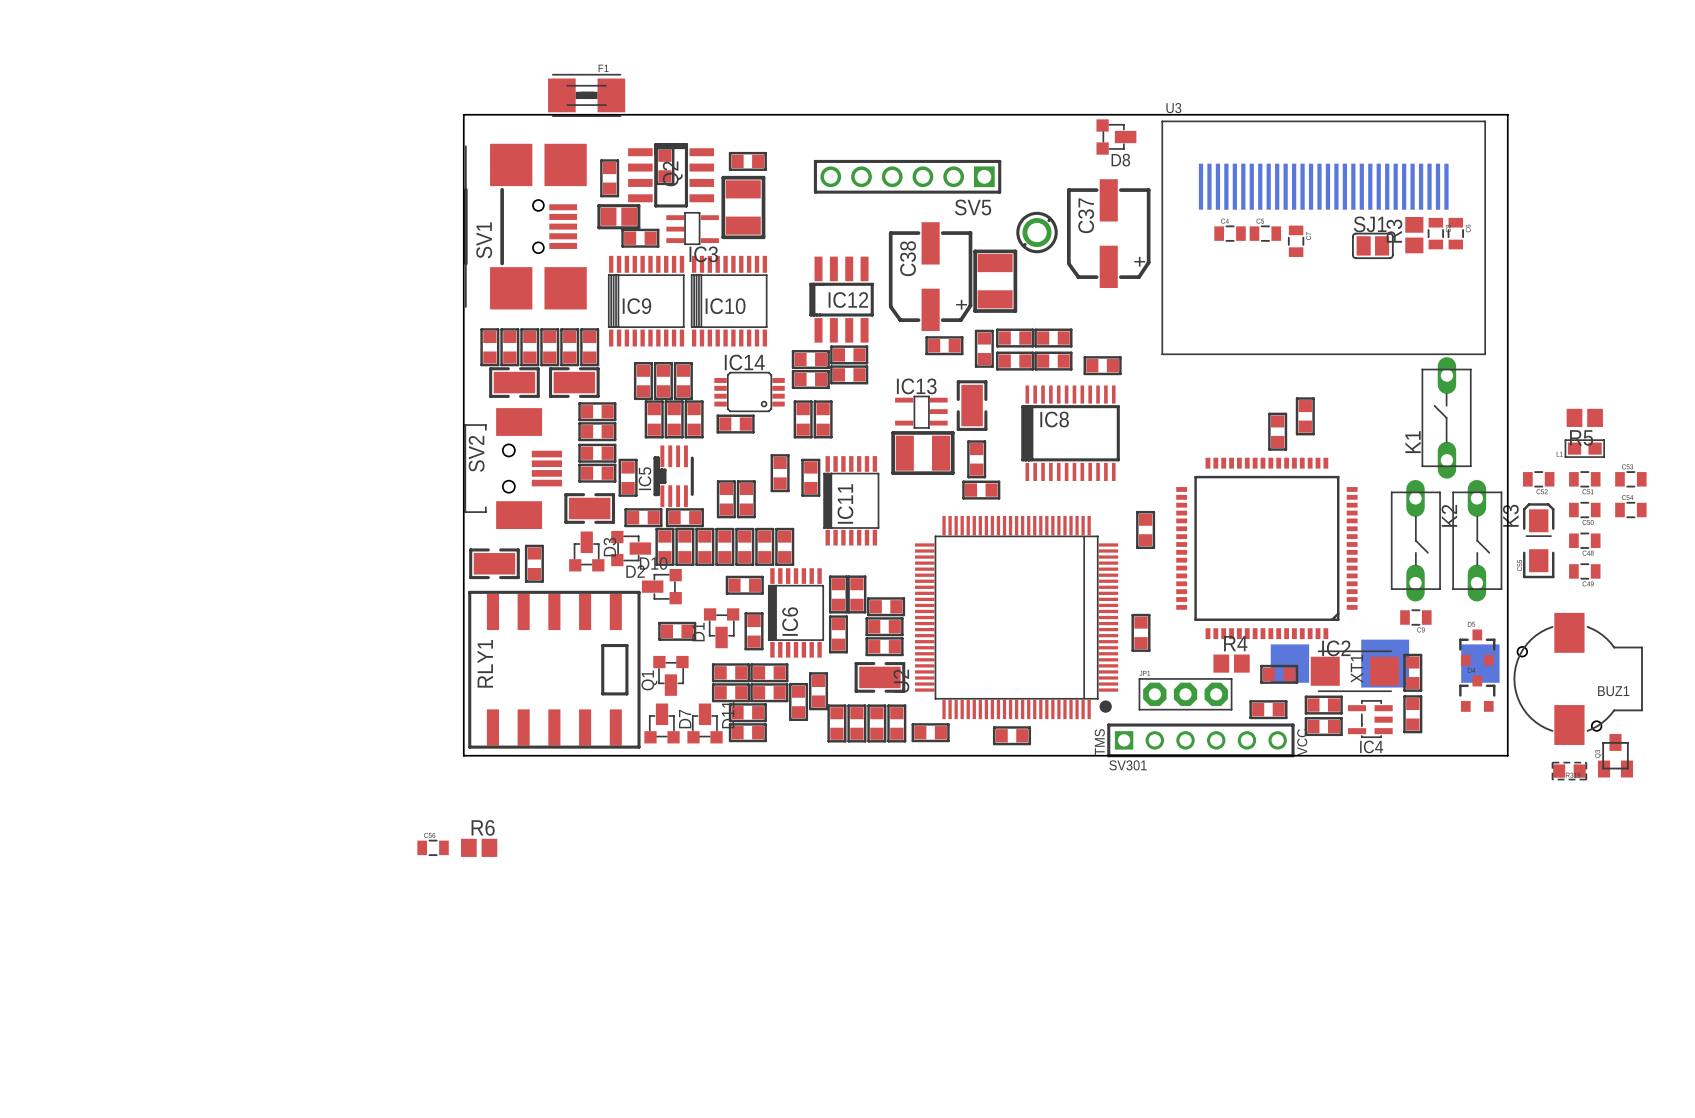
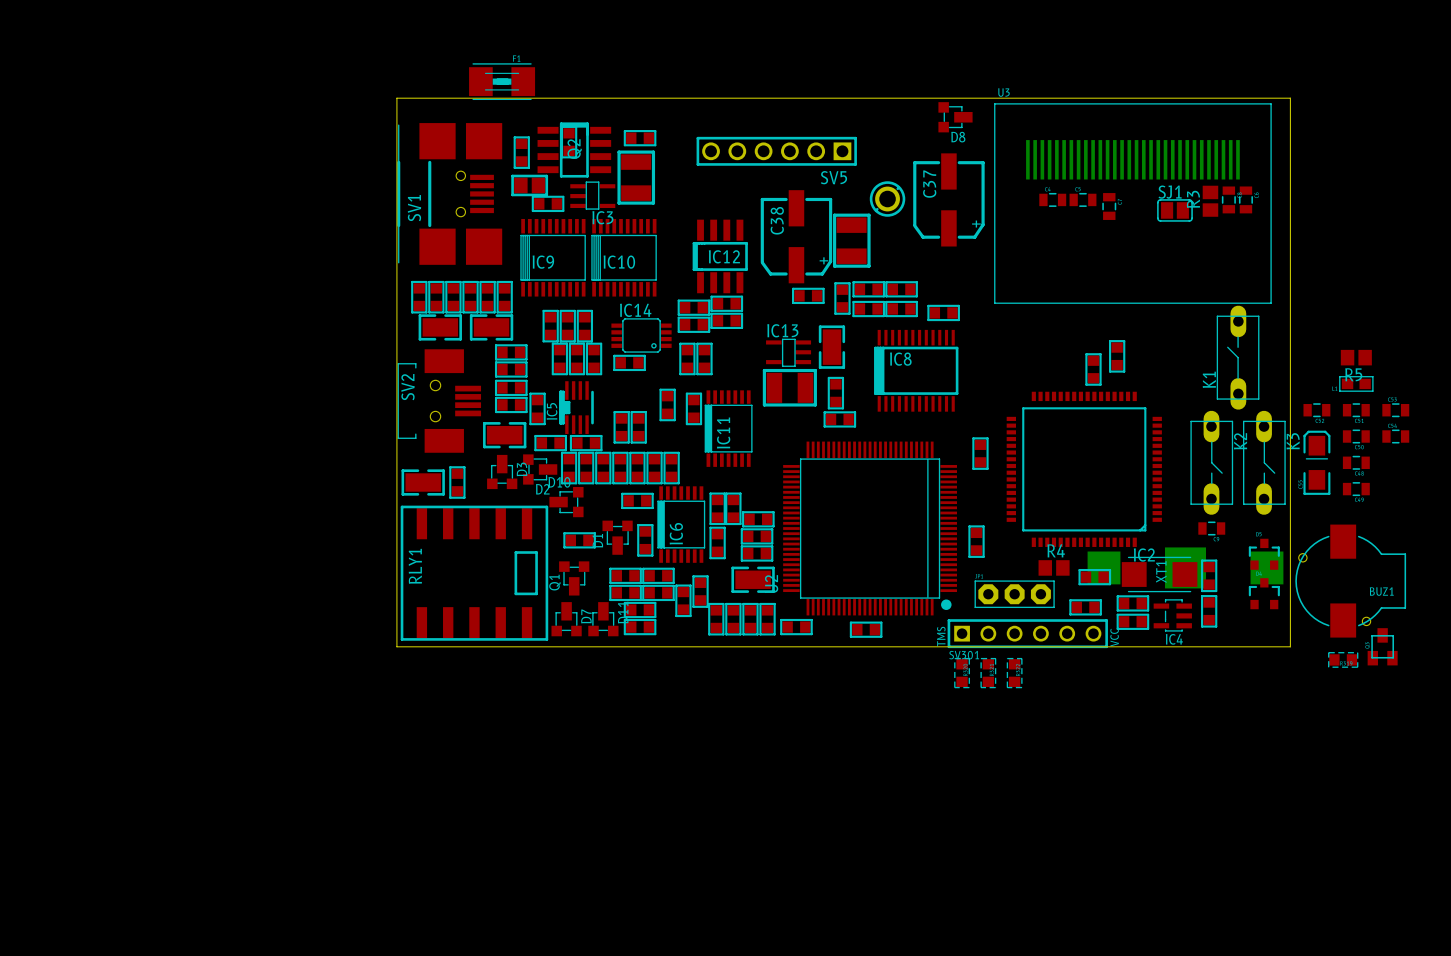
part: none -> (962, 673)
part: none -> (988, 673)
part: none -> (1014, 673)
part: (433, 847) -> none
R6: (479, 847) -> none

